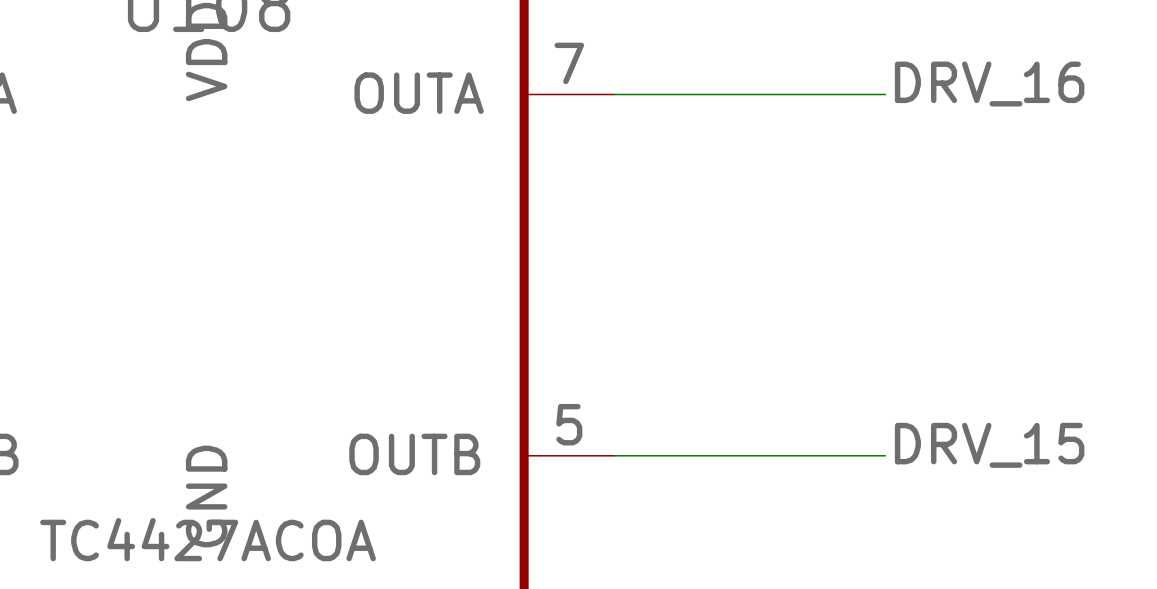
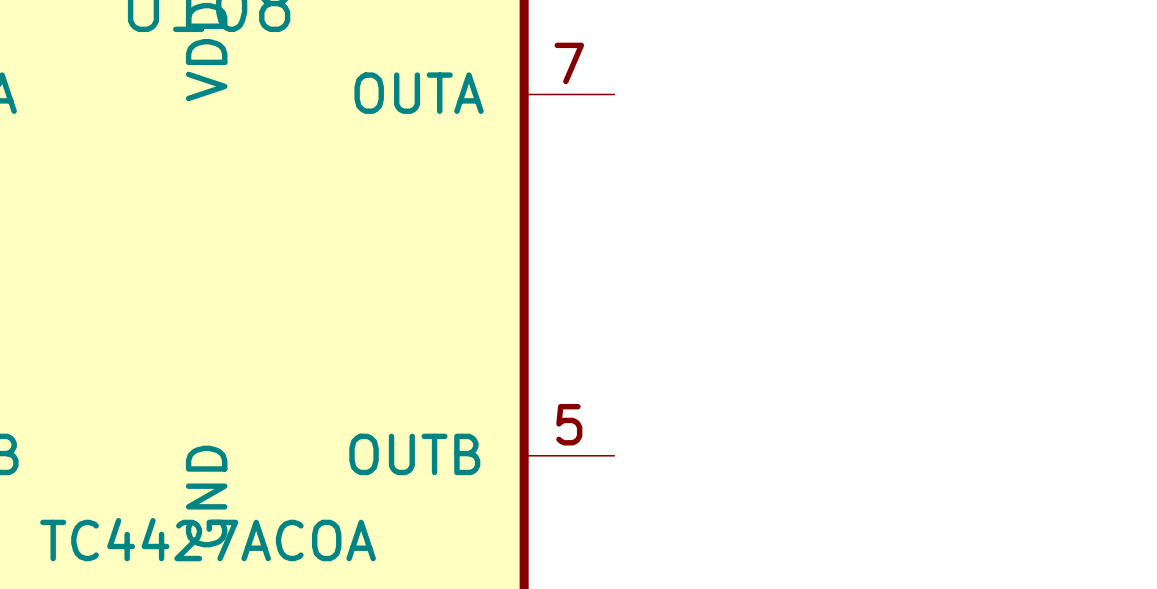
label: DRV_16 (989, 84) -> none
wire: (614, 94) (885, 94) -> none
label: DRV_15 (989, 445) -> none
wire: (614, 455) (885, 455) -> none

